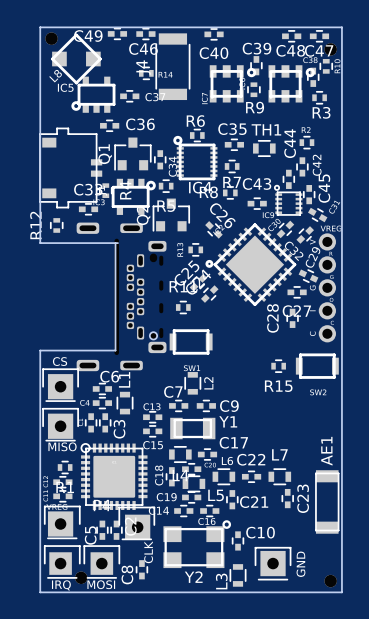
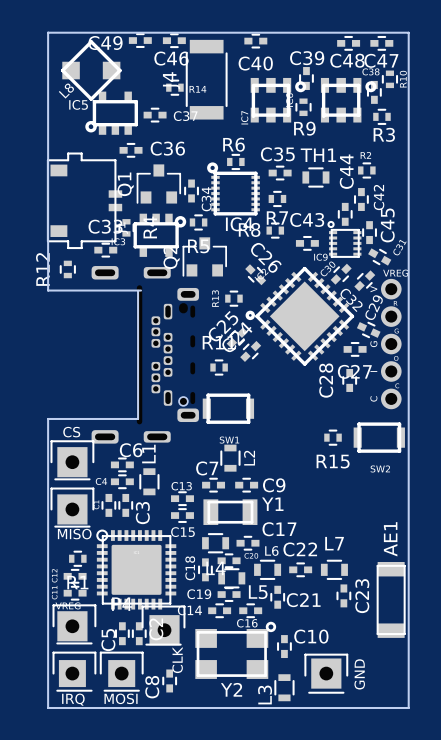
part: (51, 38) -> none
part: (330, 49) -> none
part: (81, 577) -> none
part: (330, 581) -> none

